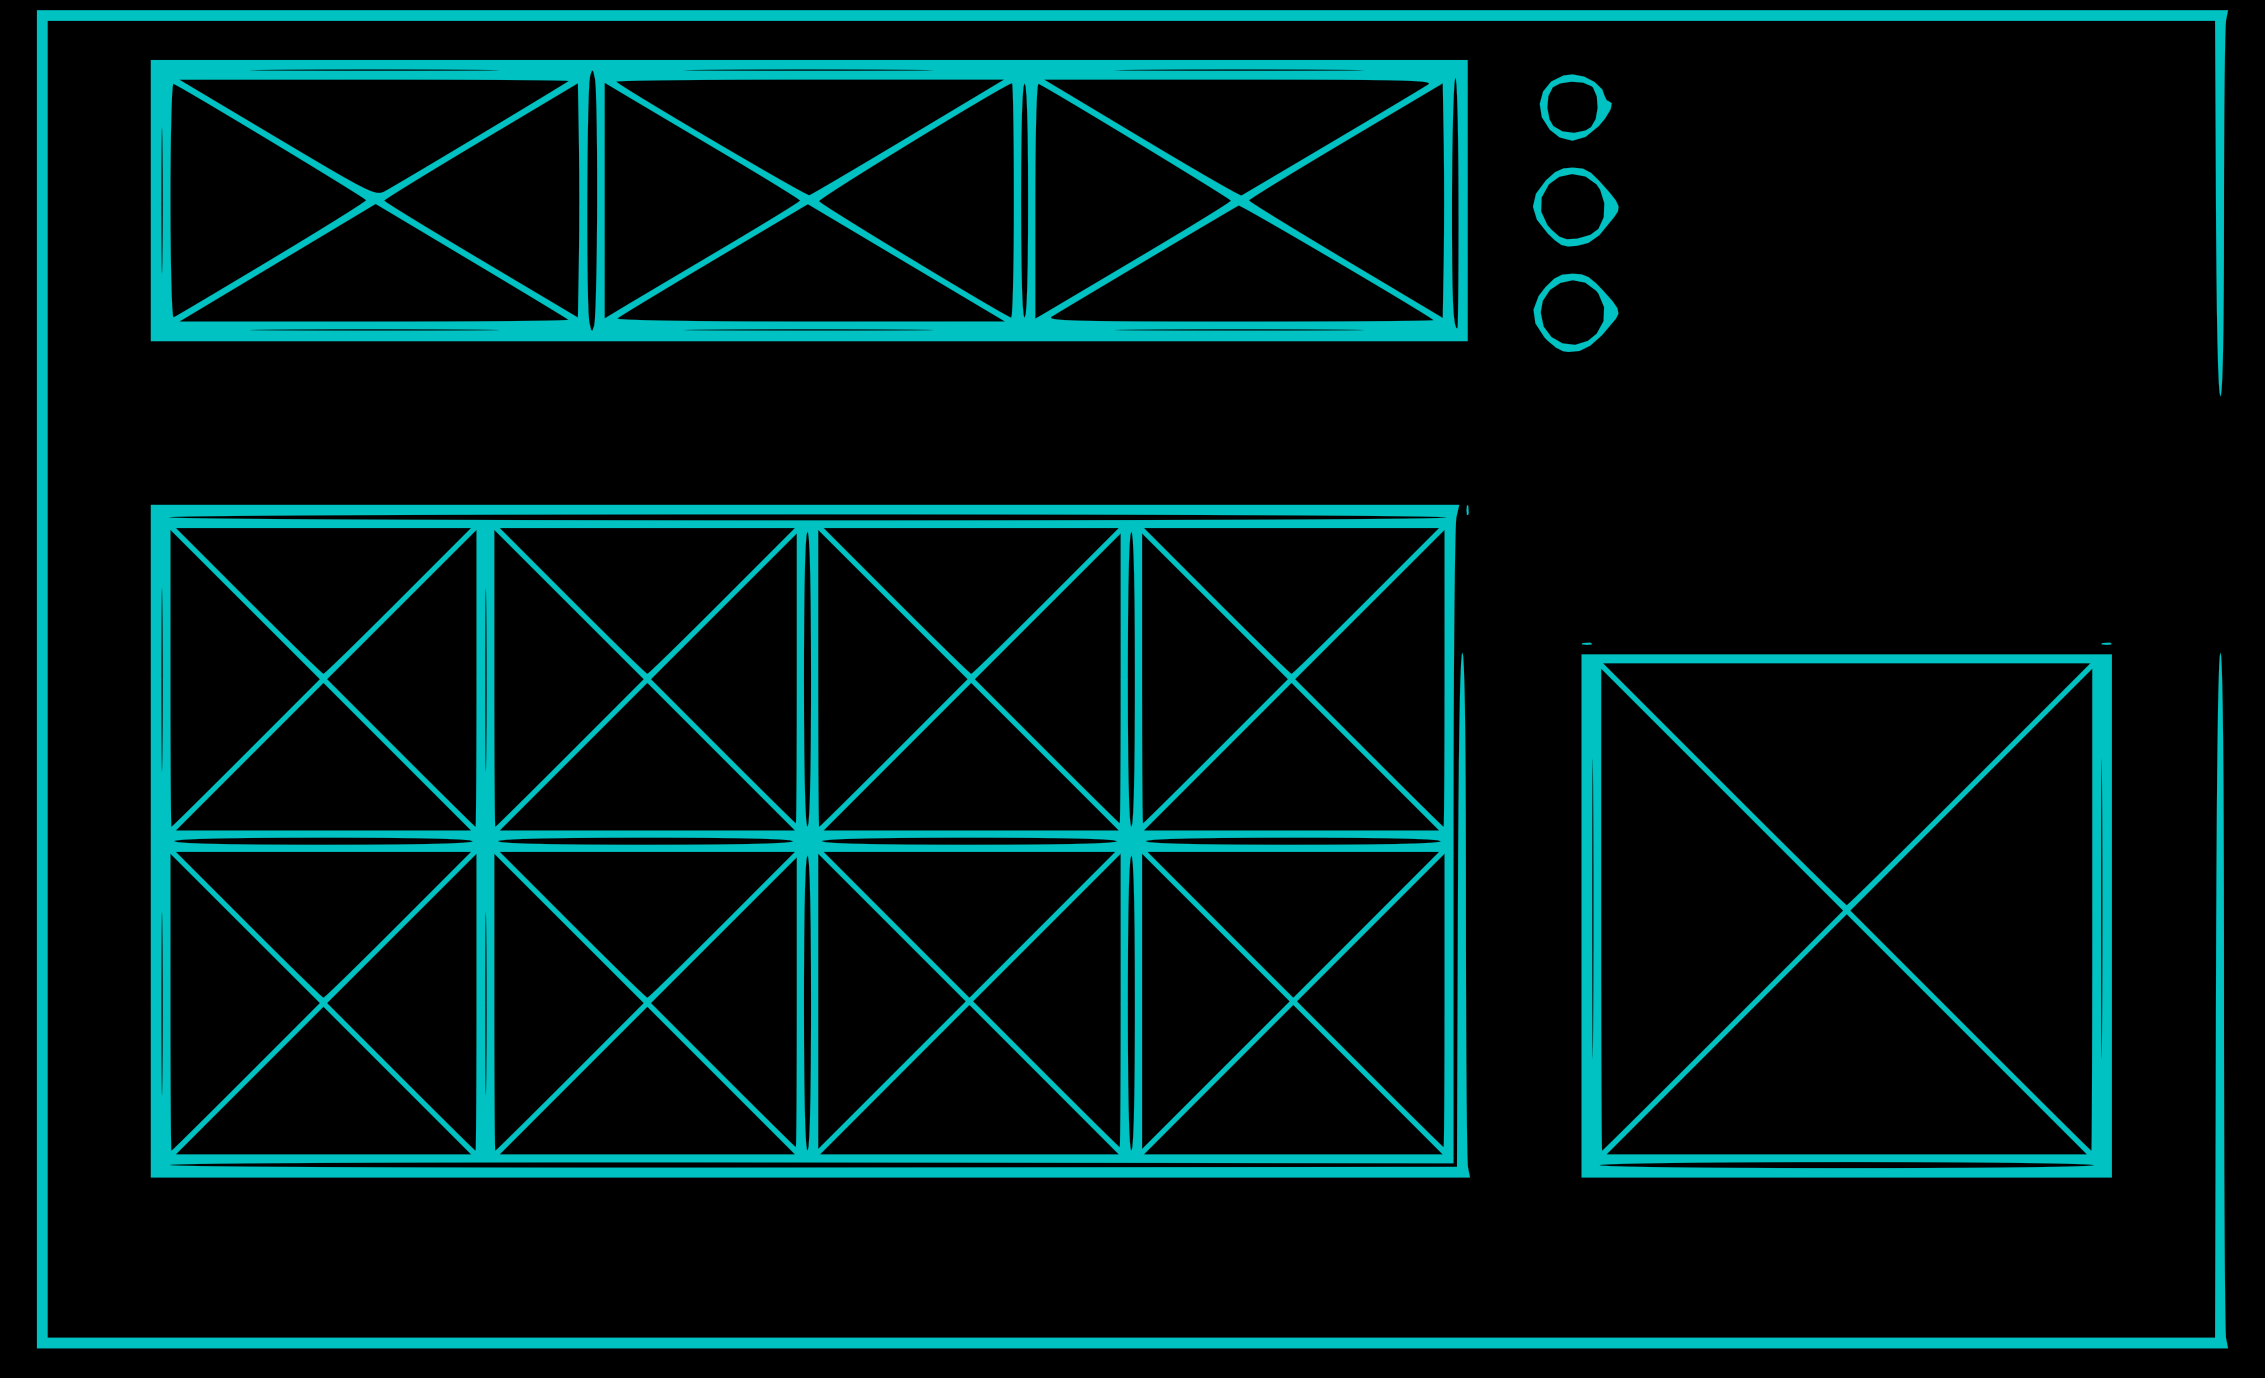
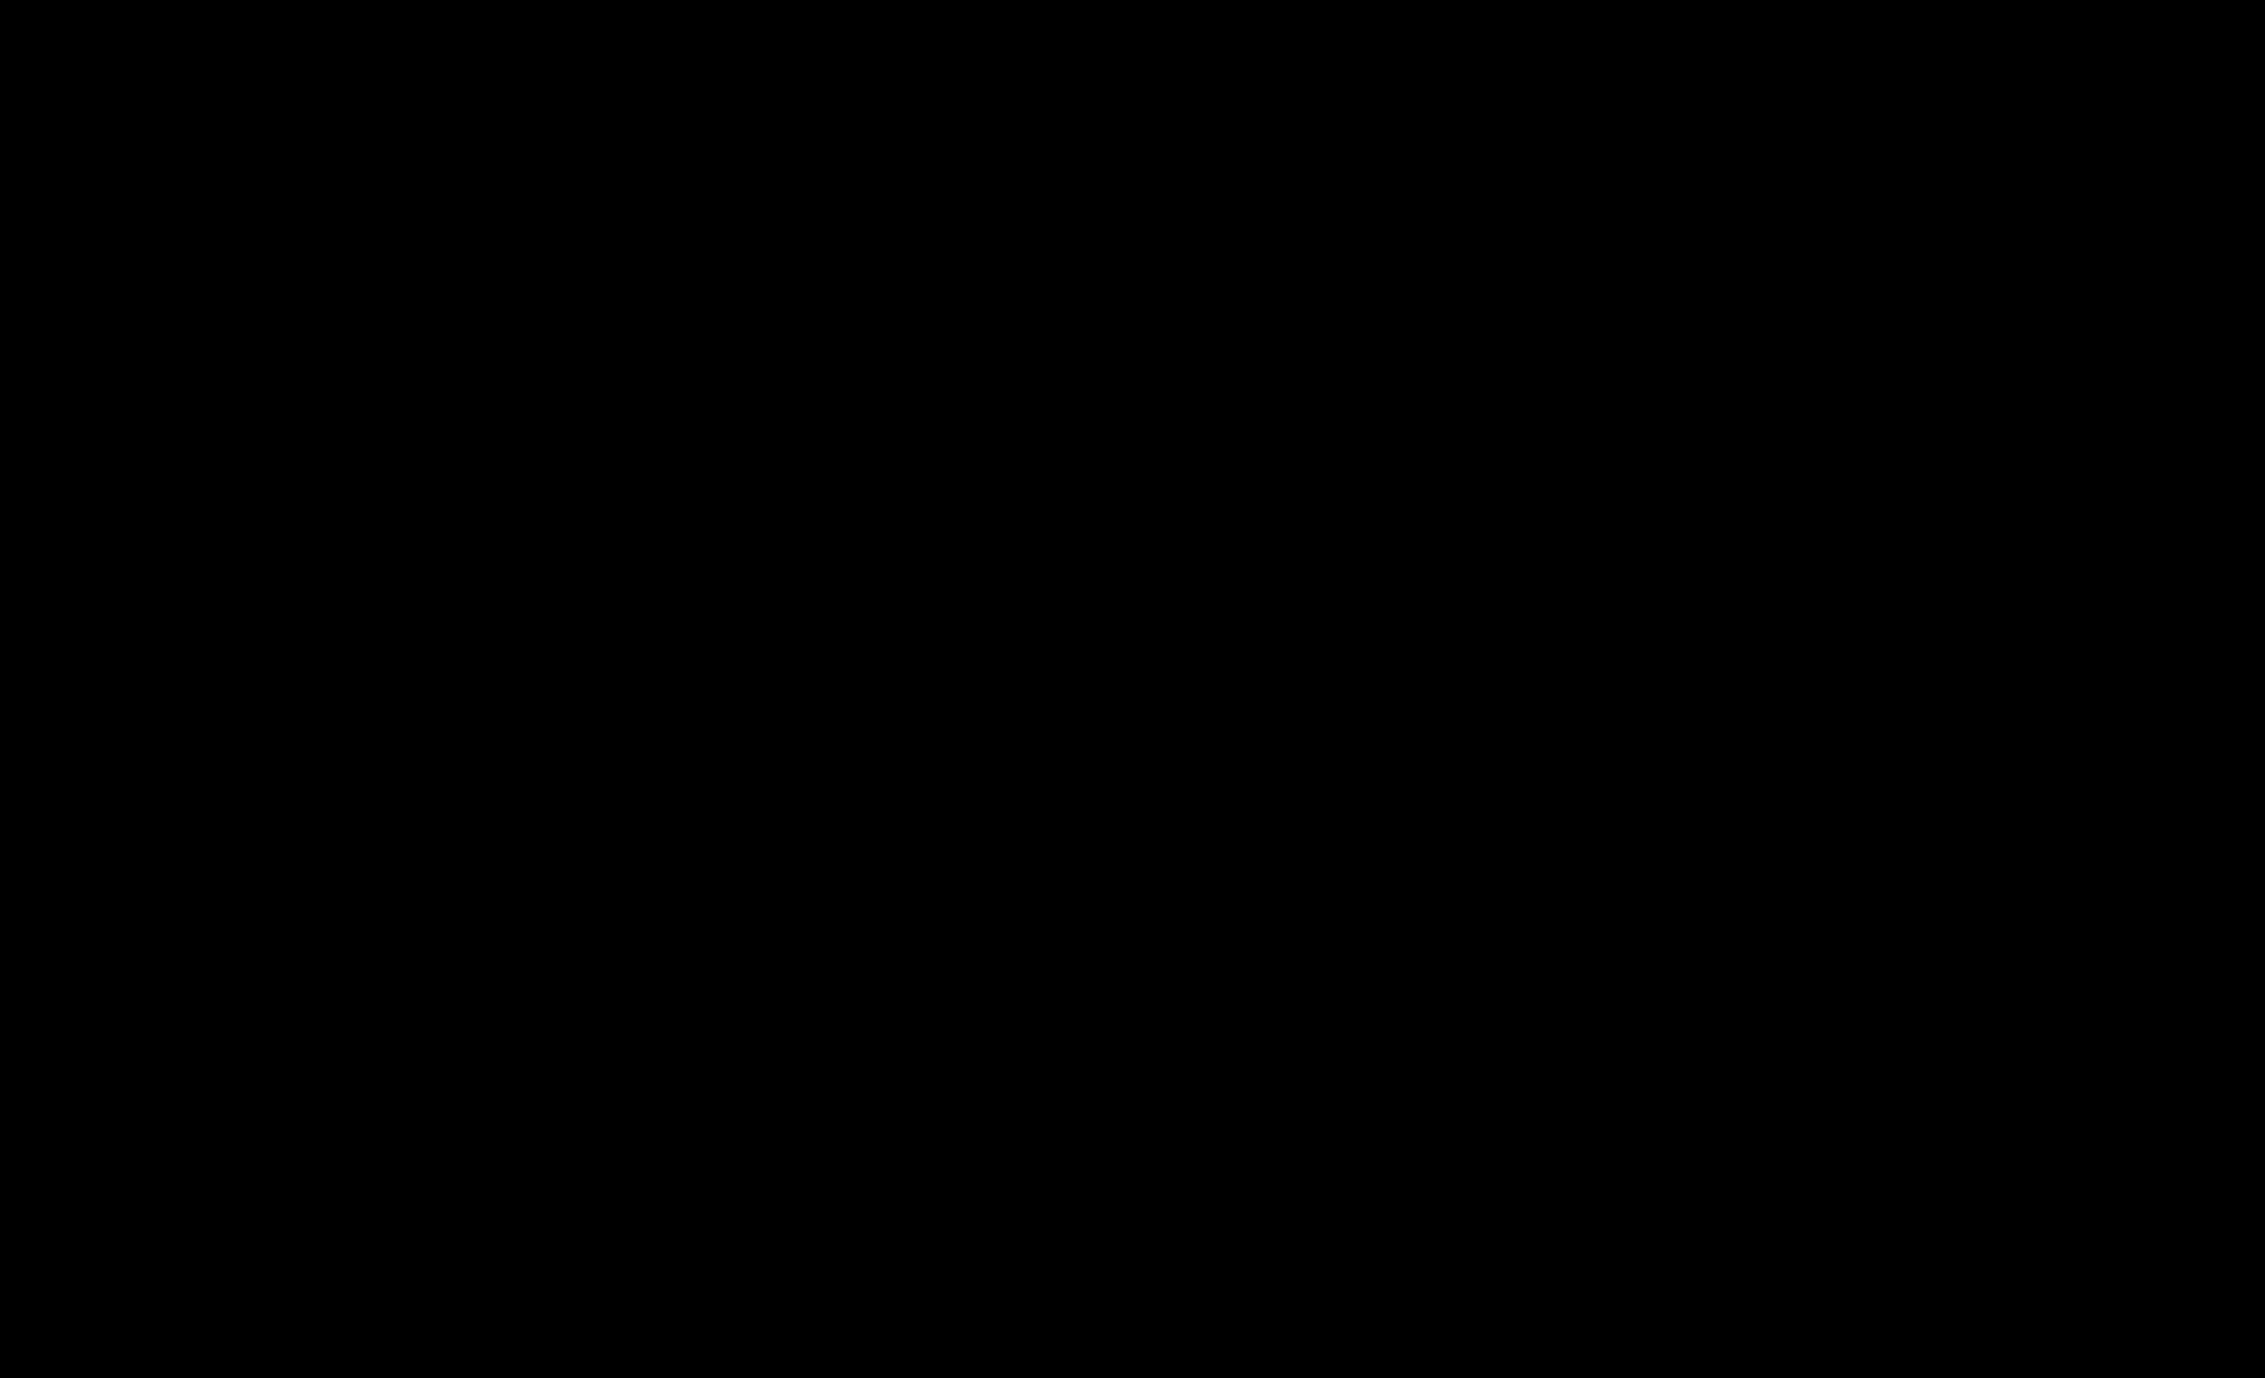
drawing: [36, 10, 2229, 1349] -> none

